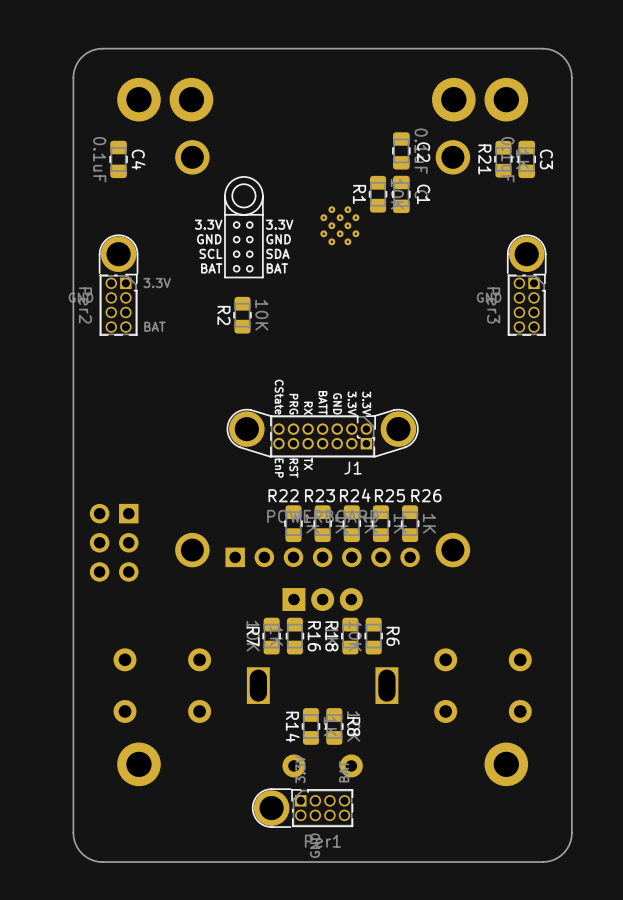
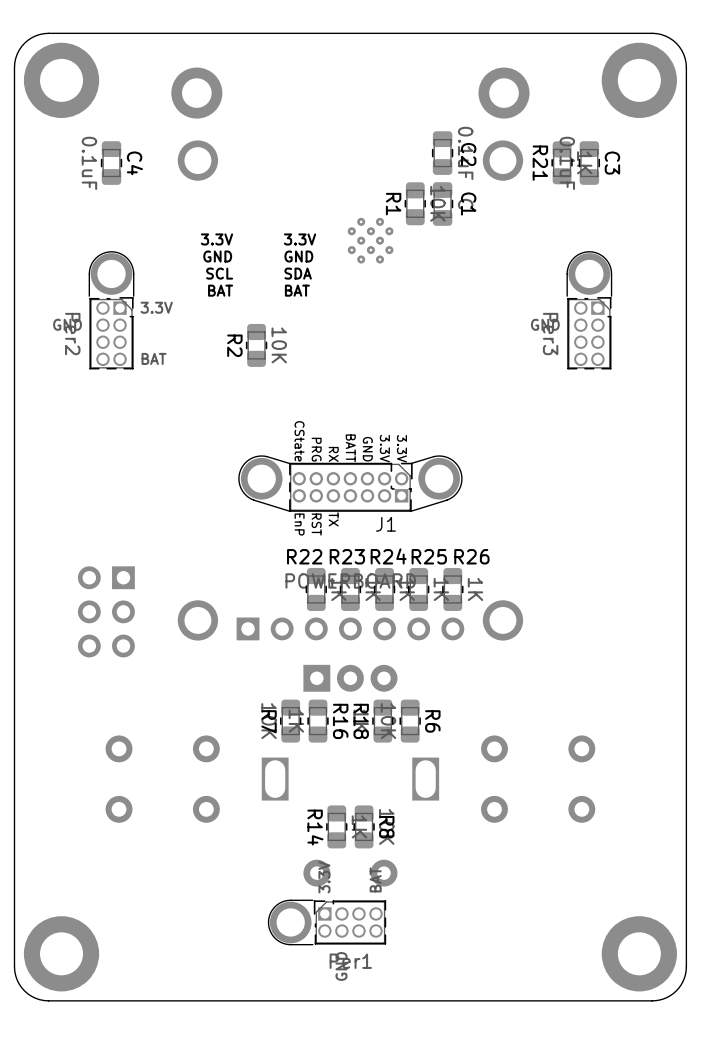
board edge: (542, 48) (553, 50) (563, 57) (569, 66) (571, 77) (571, 832) (569, 845) (563, 853) (555, 859) (542, 862) (102, 862) (87, 858) (77, 847) (73, 832) (73, 77) (75, 66) (81, 57) (91, 50) (102, 48) -> (608, 33) (652, 33) (665, 35) (679, 46) (685, 58) (686, 67) (686, 966) (683, 981) (676, 990) (667, 997) (652, 1000) (48, 1000) (31, 996) (19, 983) (14, 966) (14, 63) (21, 46) (35, 35) (48, 33) (92, 33)
part: none -> (61, 80)
part: none -> (639, 80)
part: (138, 99) -> none
part: (506, 99) -> none
drawing: [224, 176, 264, 273] -> none
line: (262, 195) (262, 277) (224, 277) (224, 195) -> none
line: (262, 214) (224, 214) -> none
part: (138, 764) -> none
part: (506, 764) -> none
part: none -> (61, 953)
part: none -> (639, 953)

